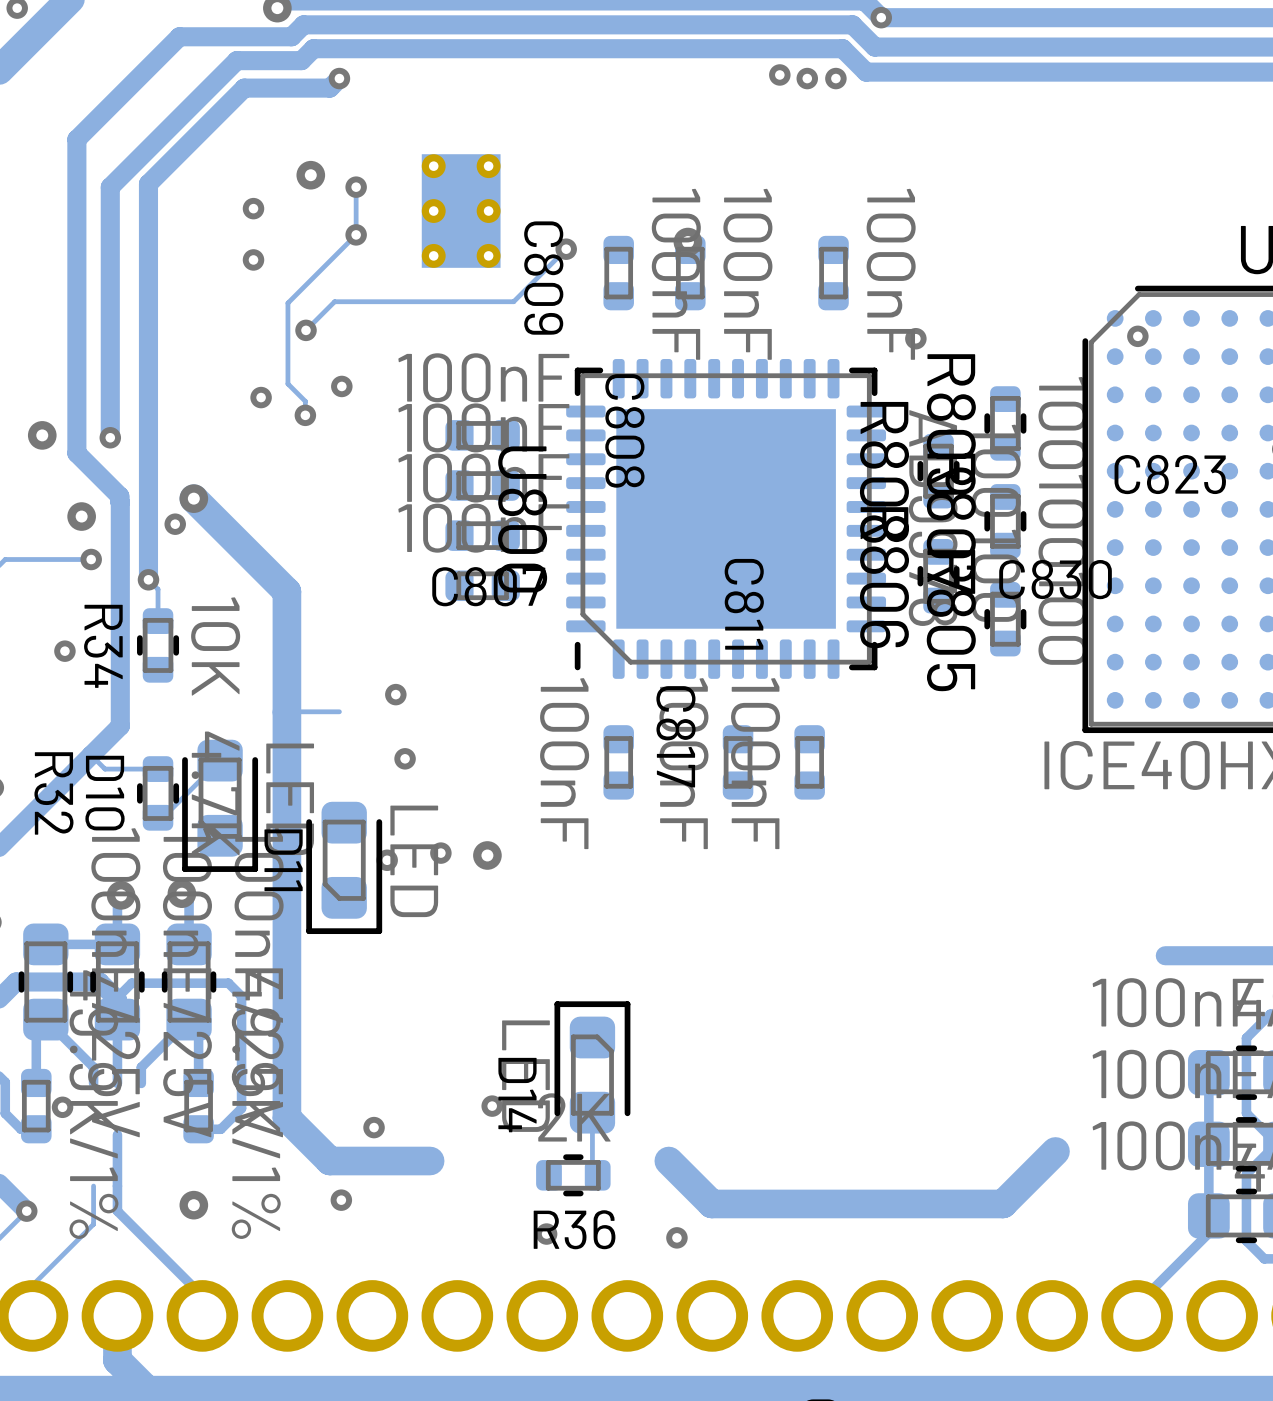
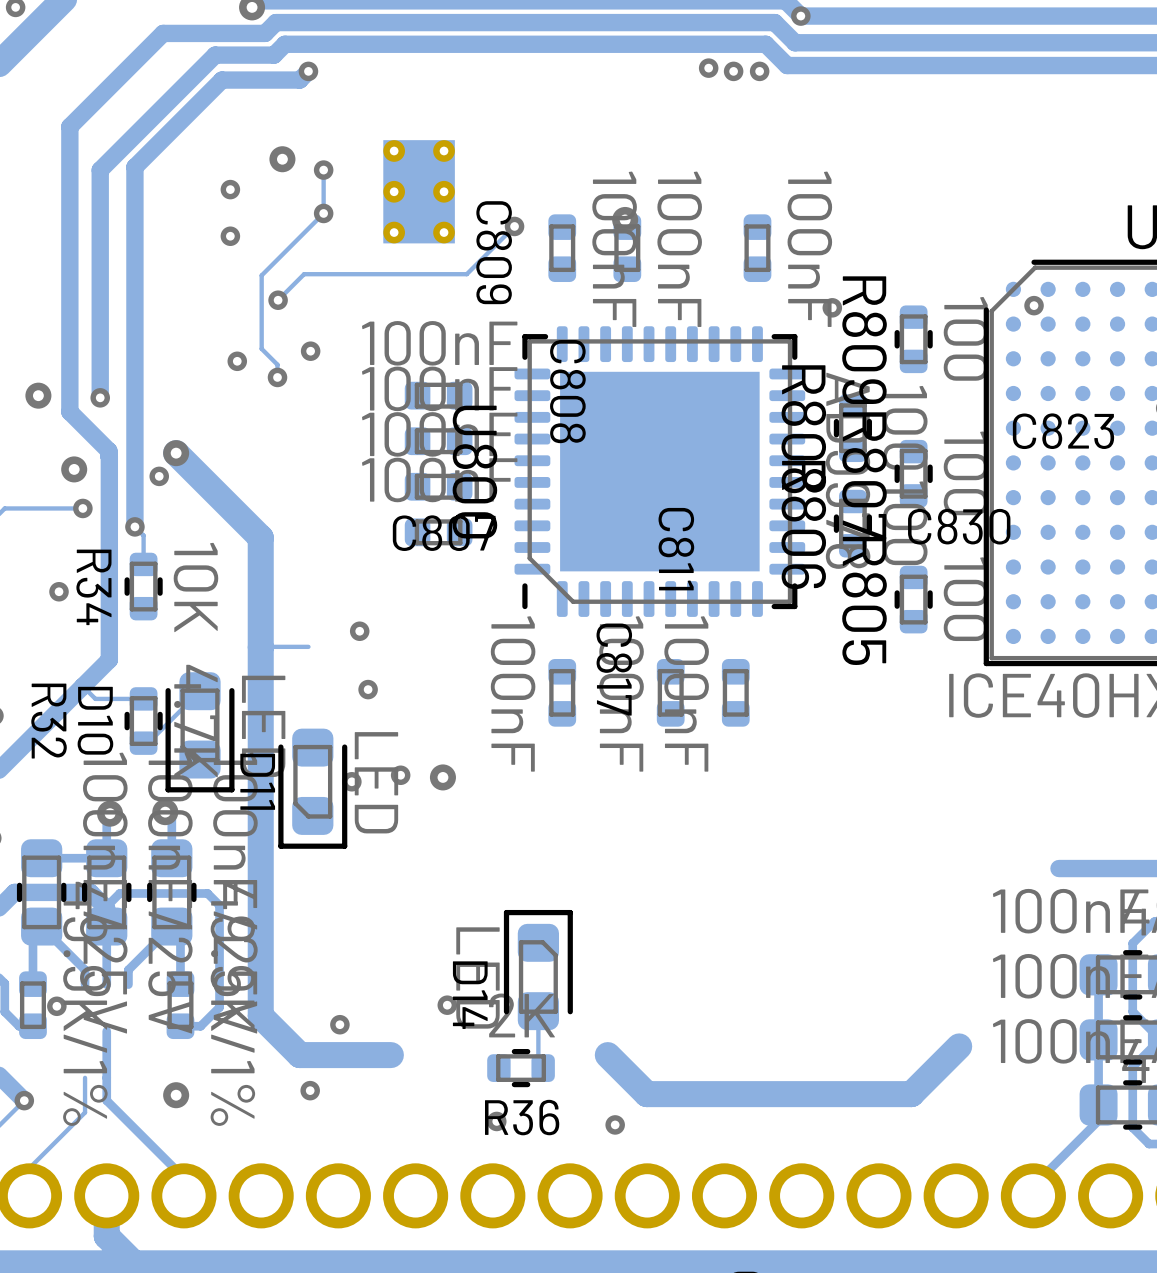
R809 position: (1005, 423) -> (913, 339)
R805 position: (1005, 619) -> (913, 599)

